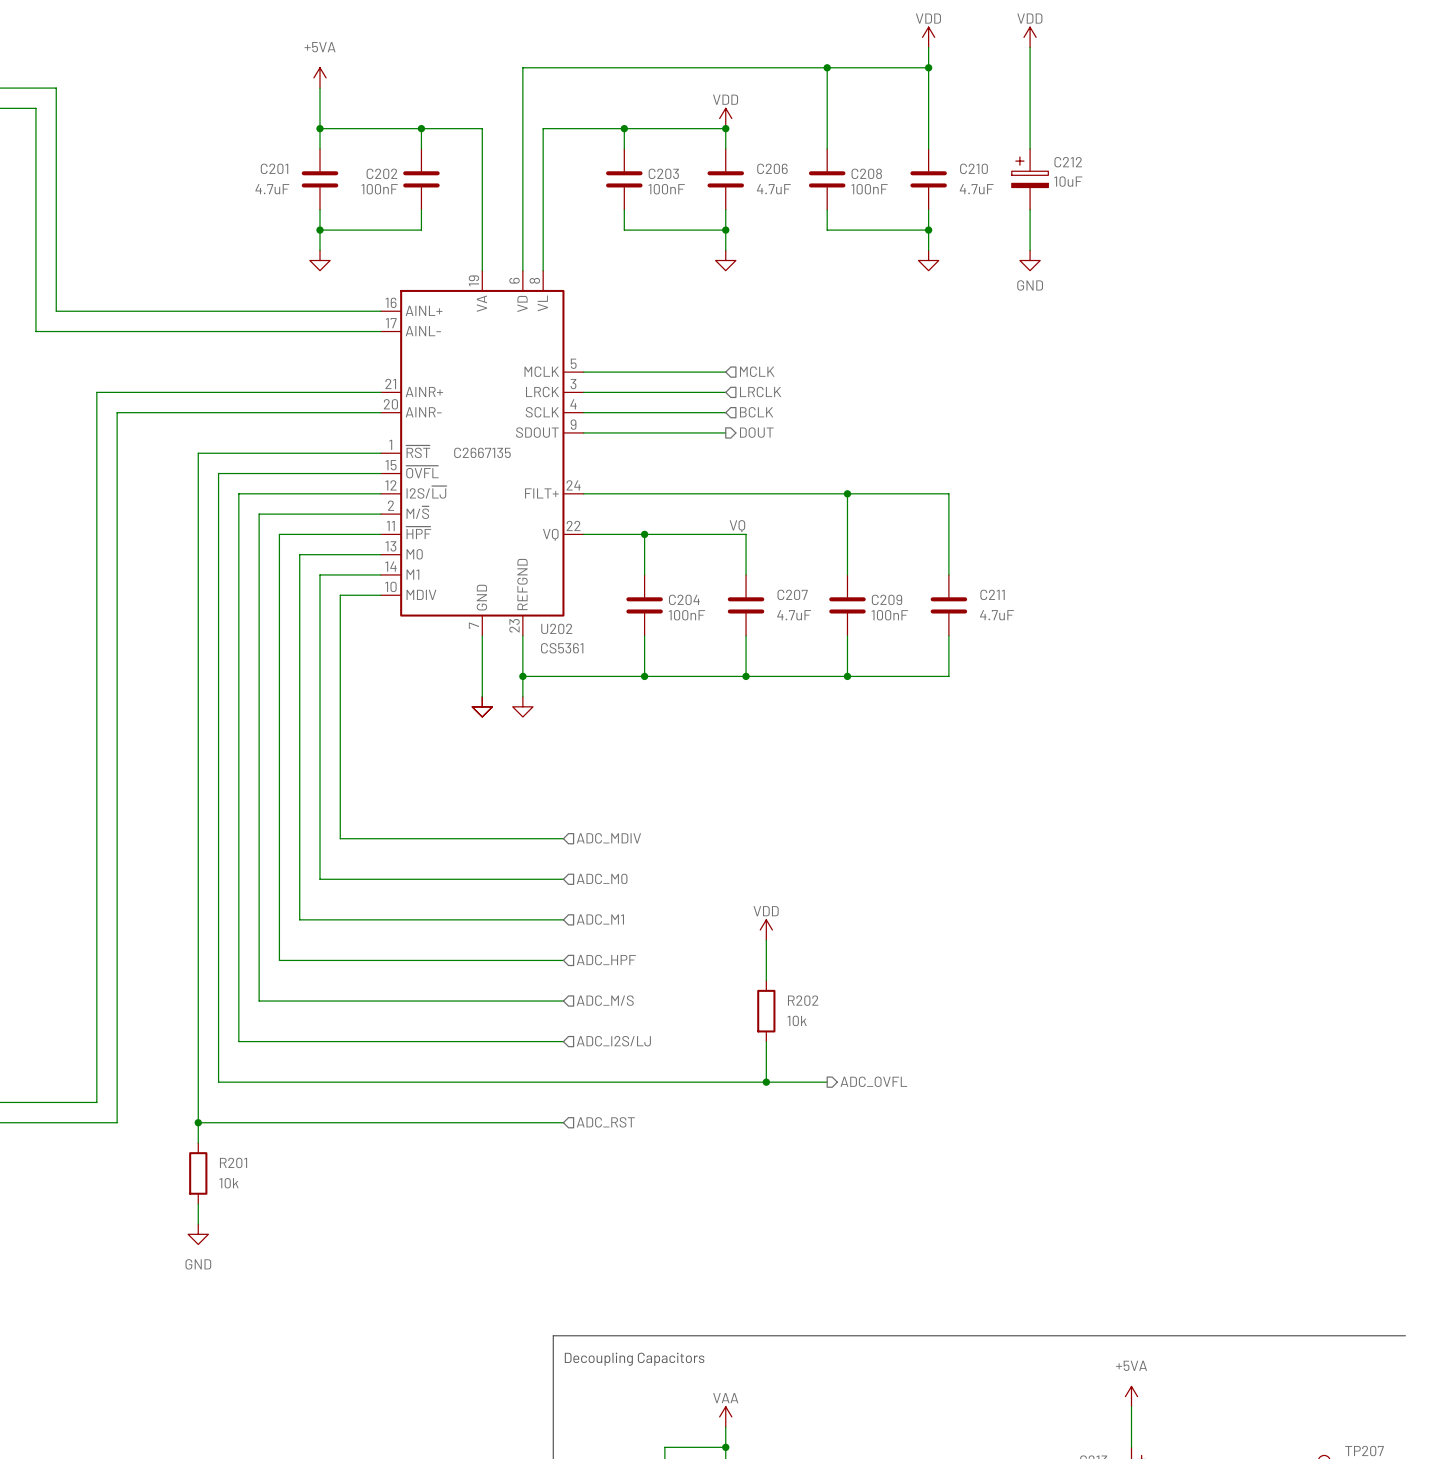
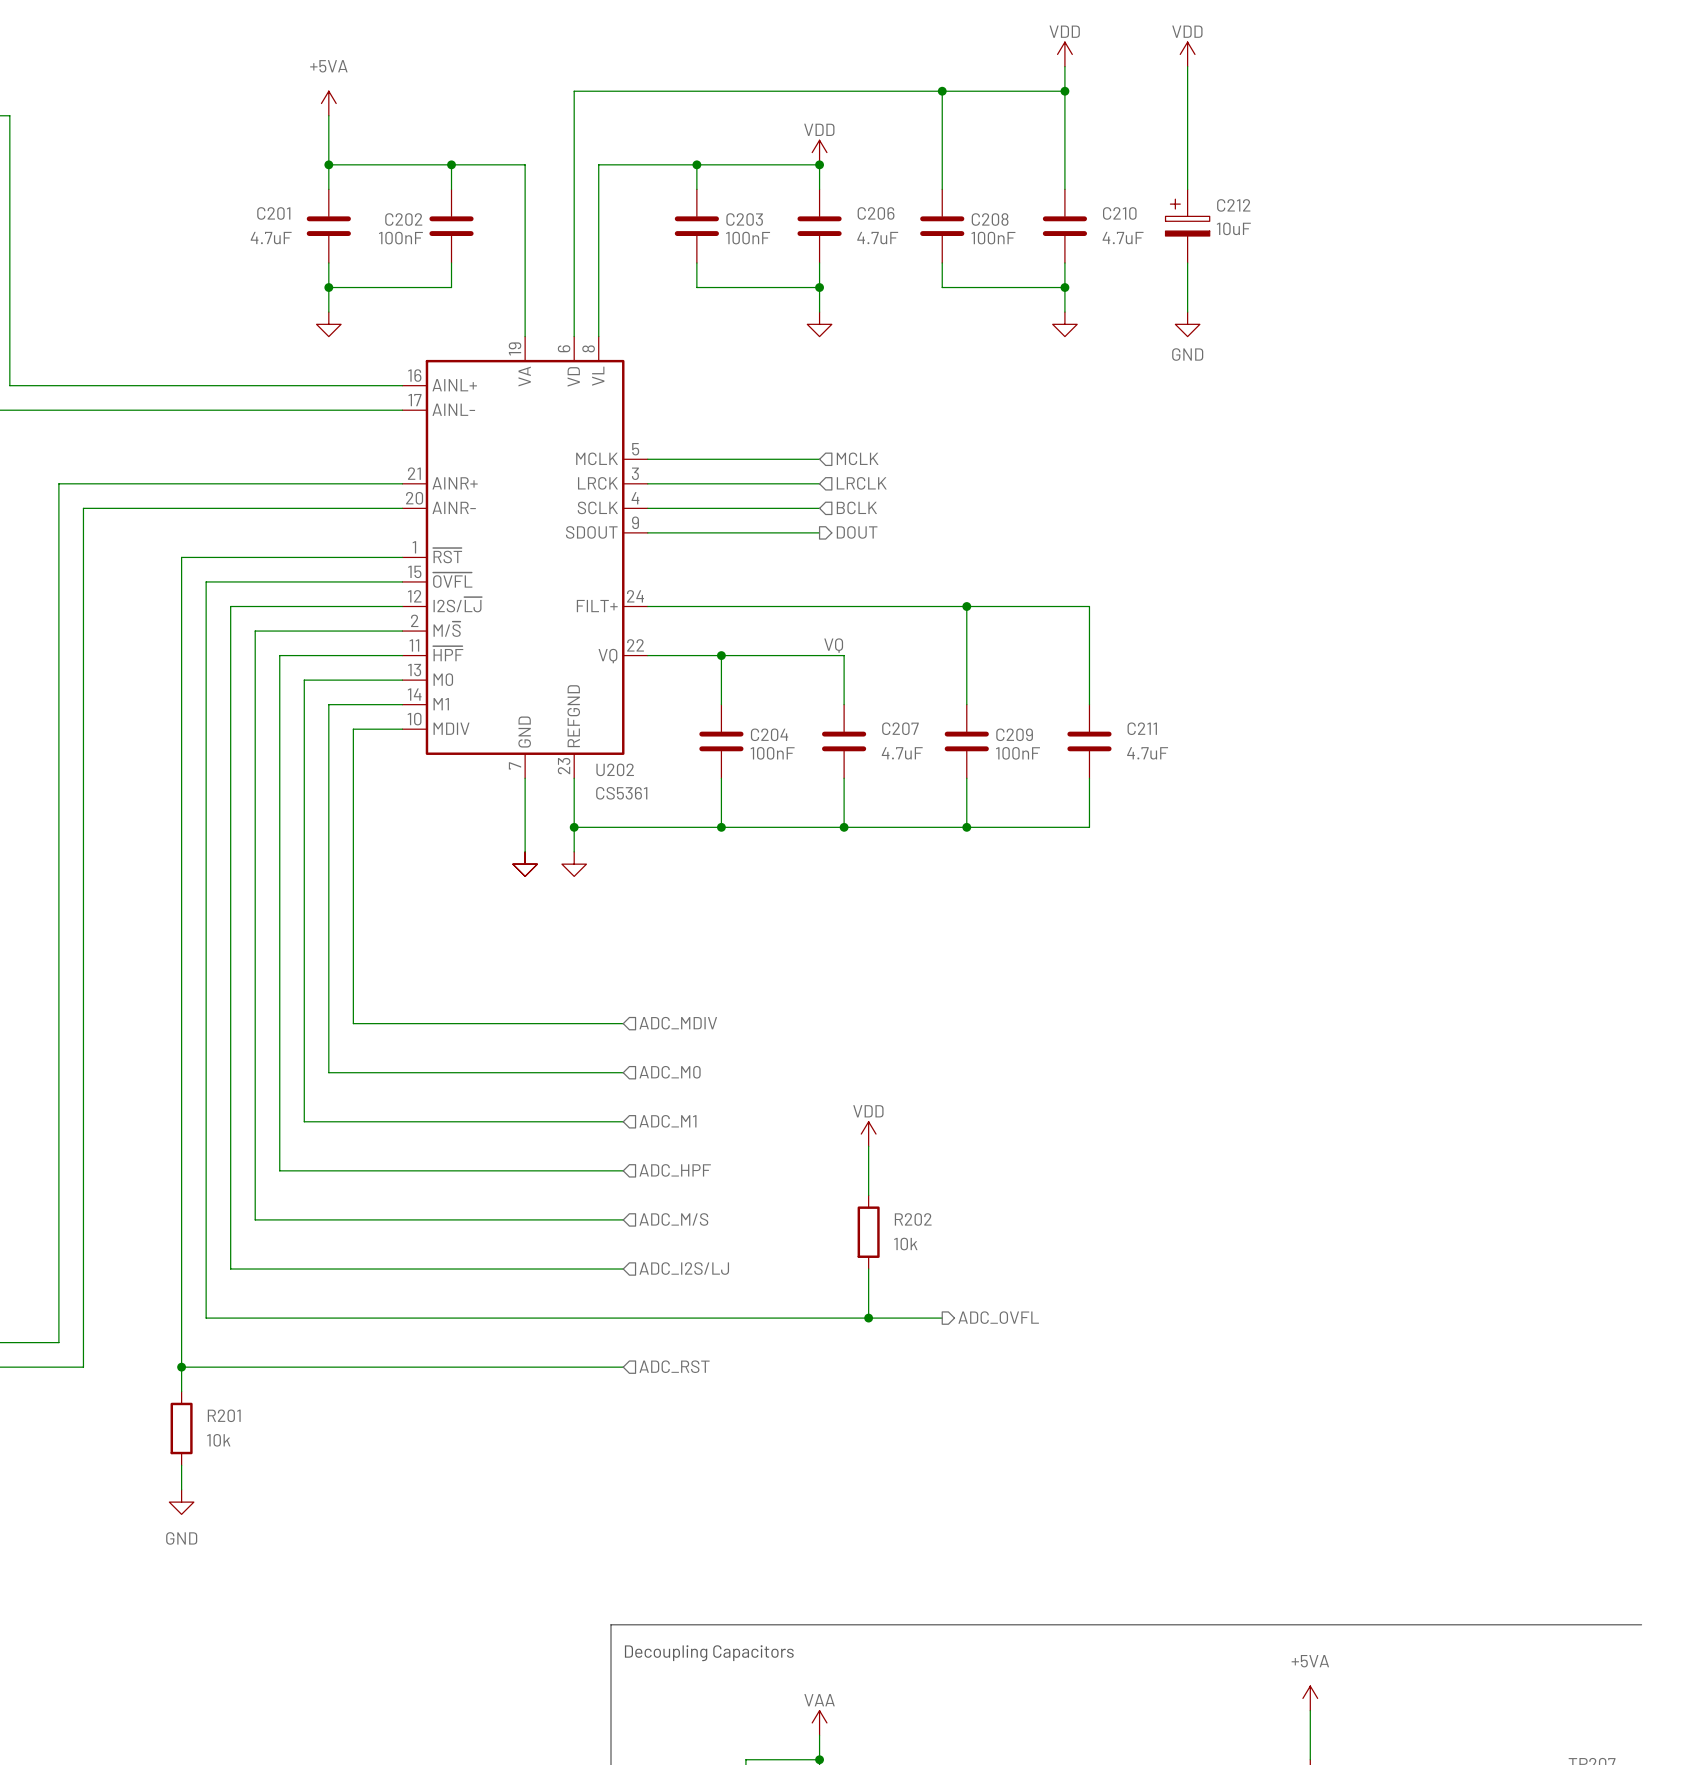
U202 text: C2667135 (482, 452) -> none

